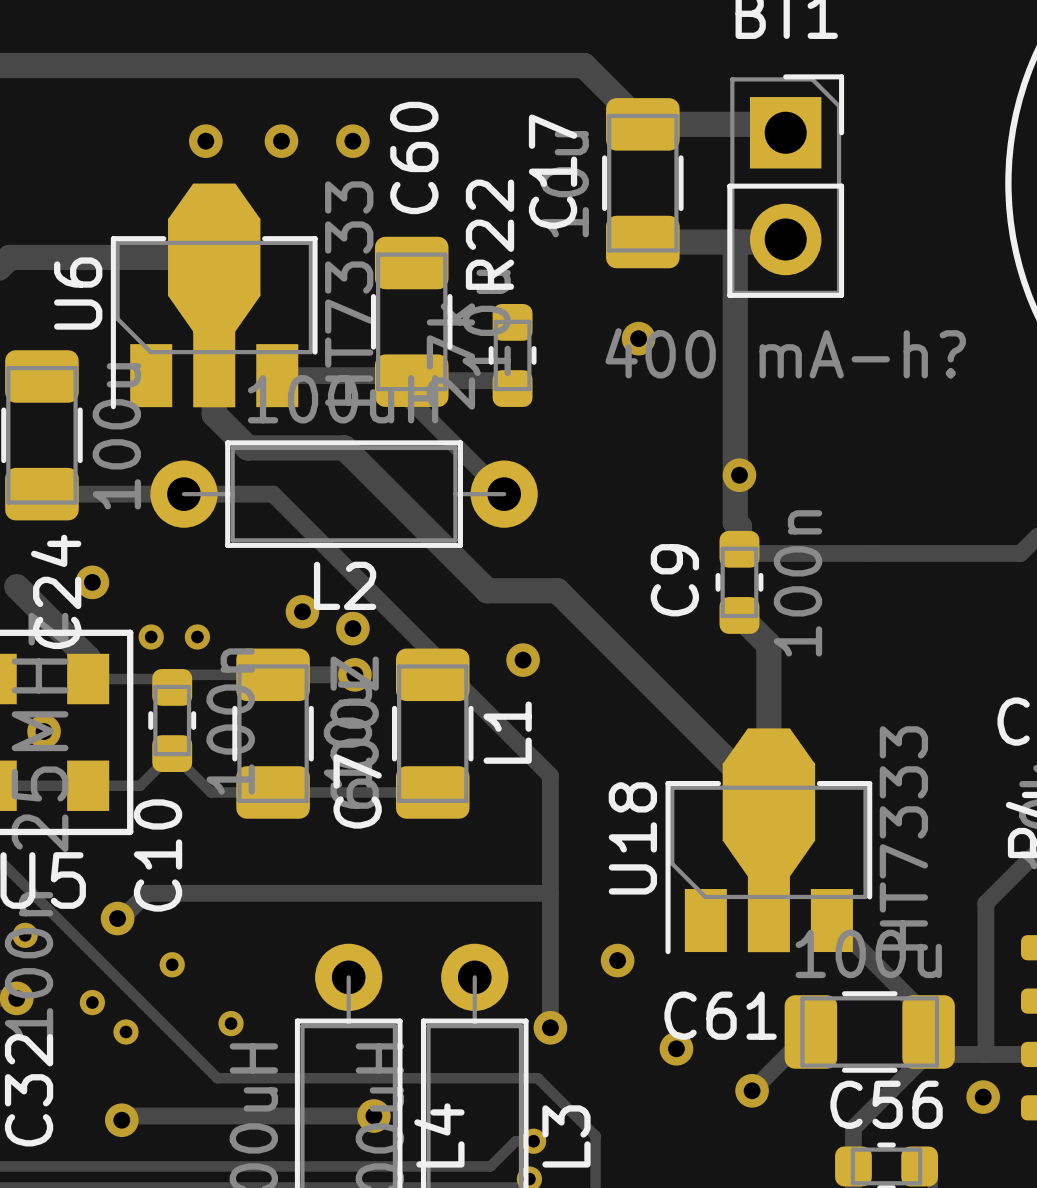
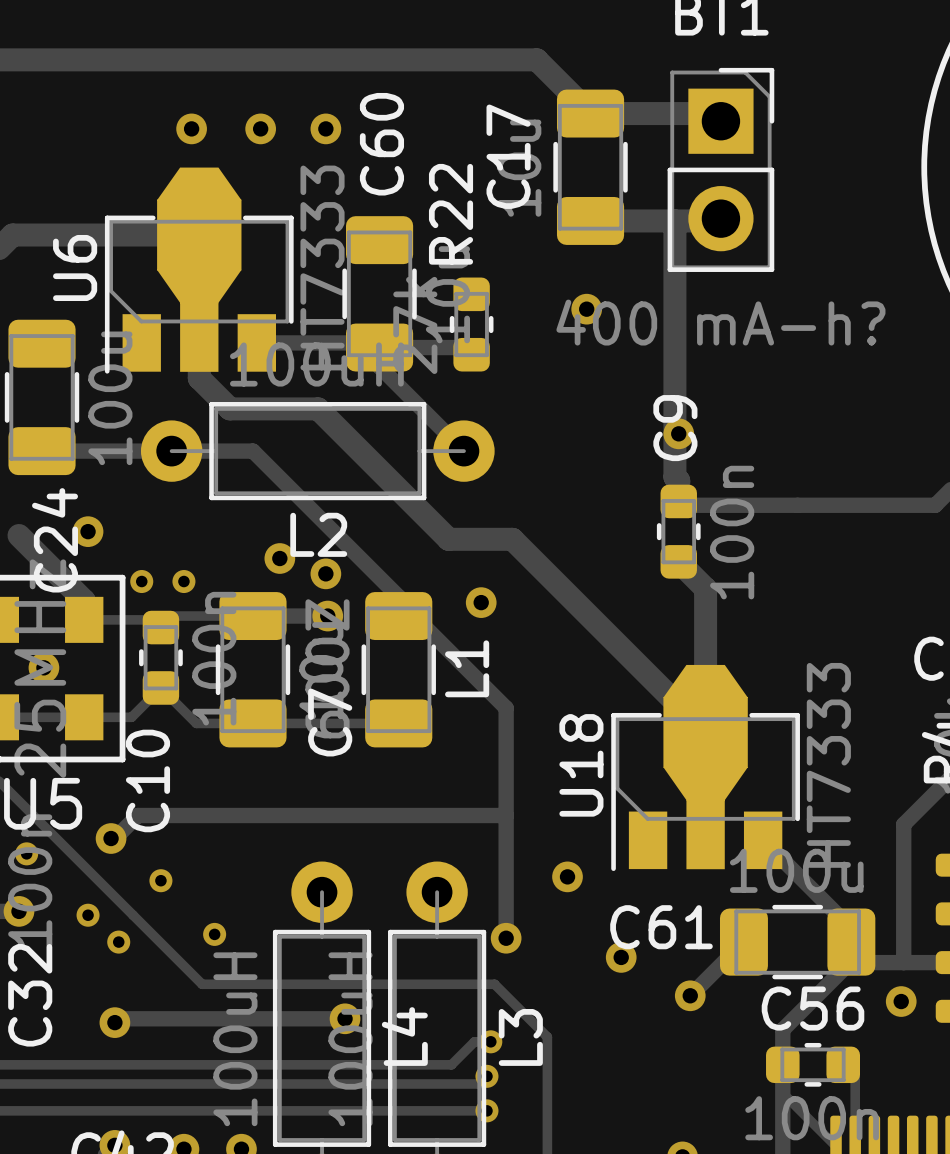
C9 name position: C9 (674, 580) -> C9 (675, 428)

